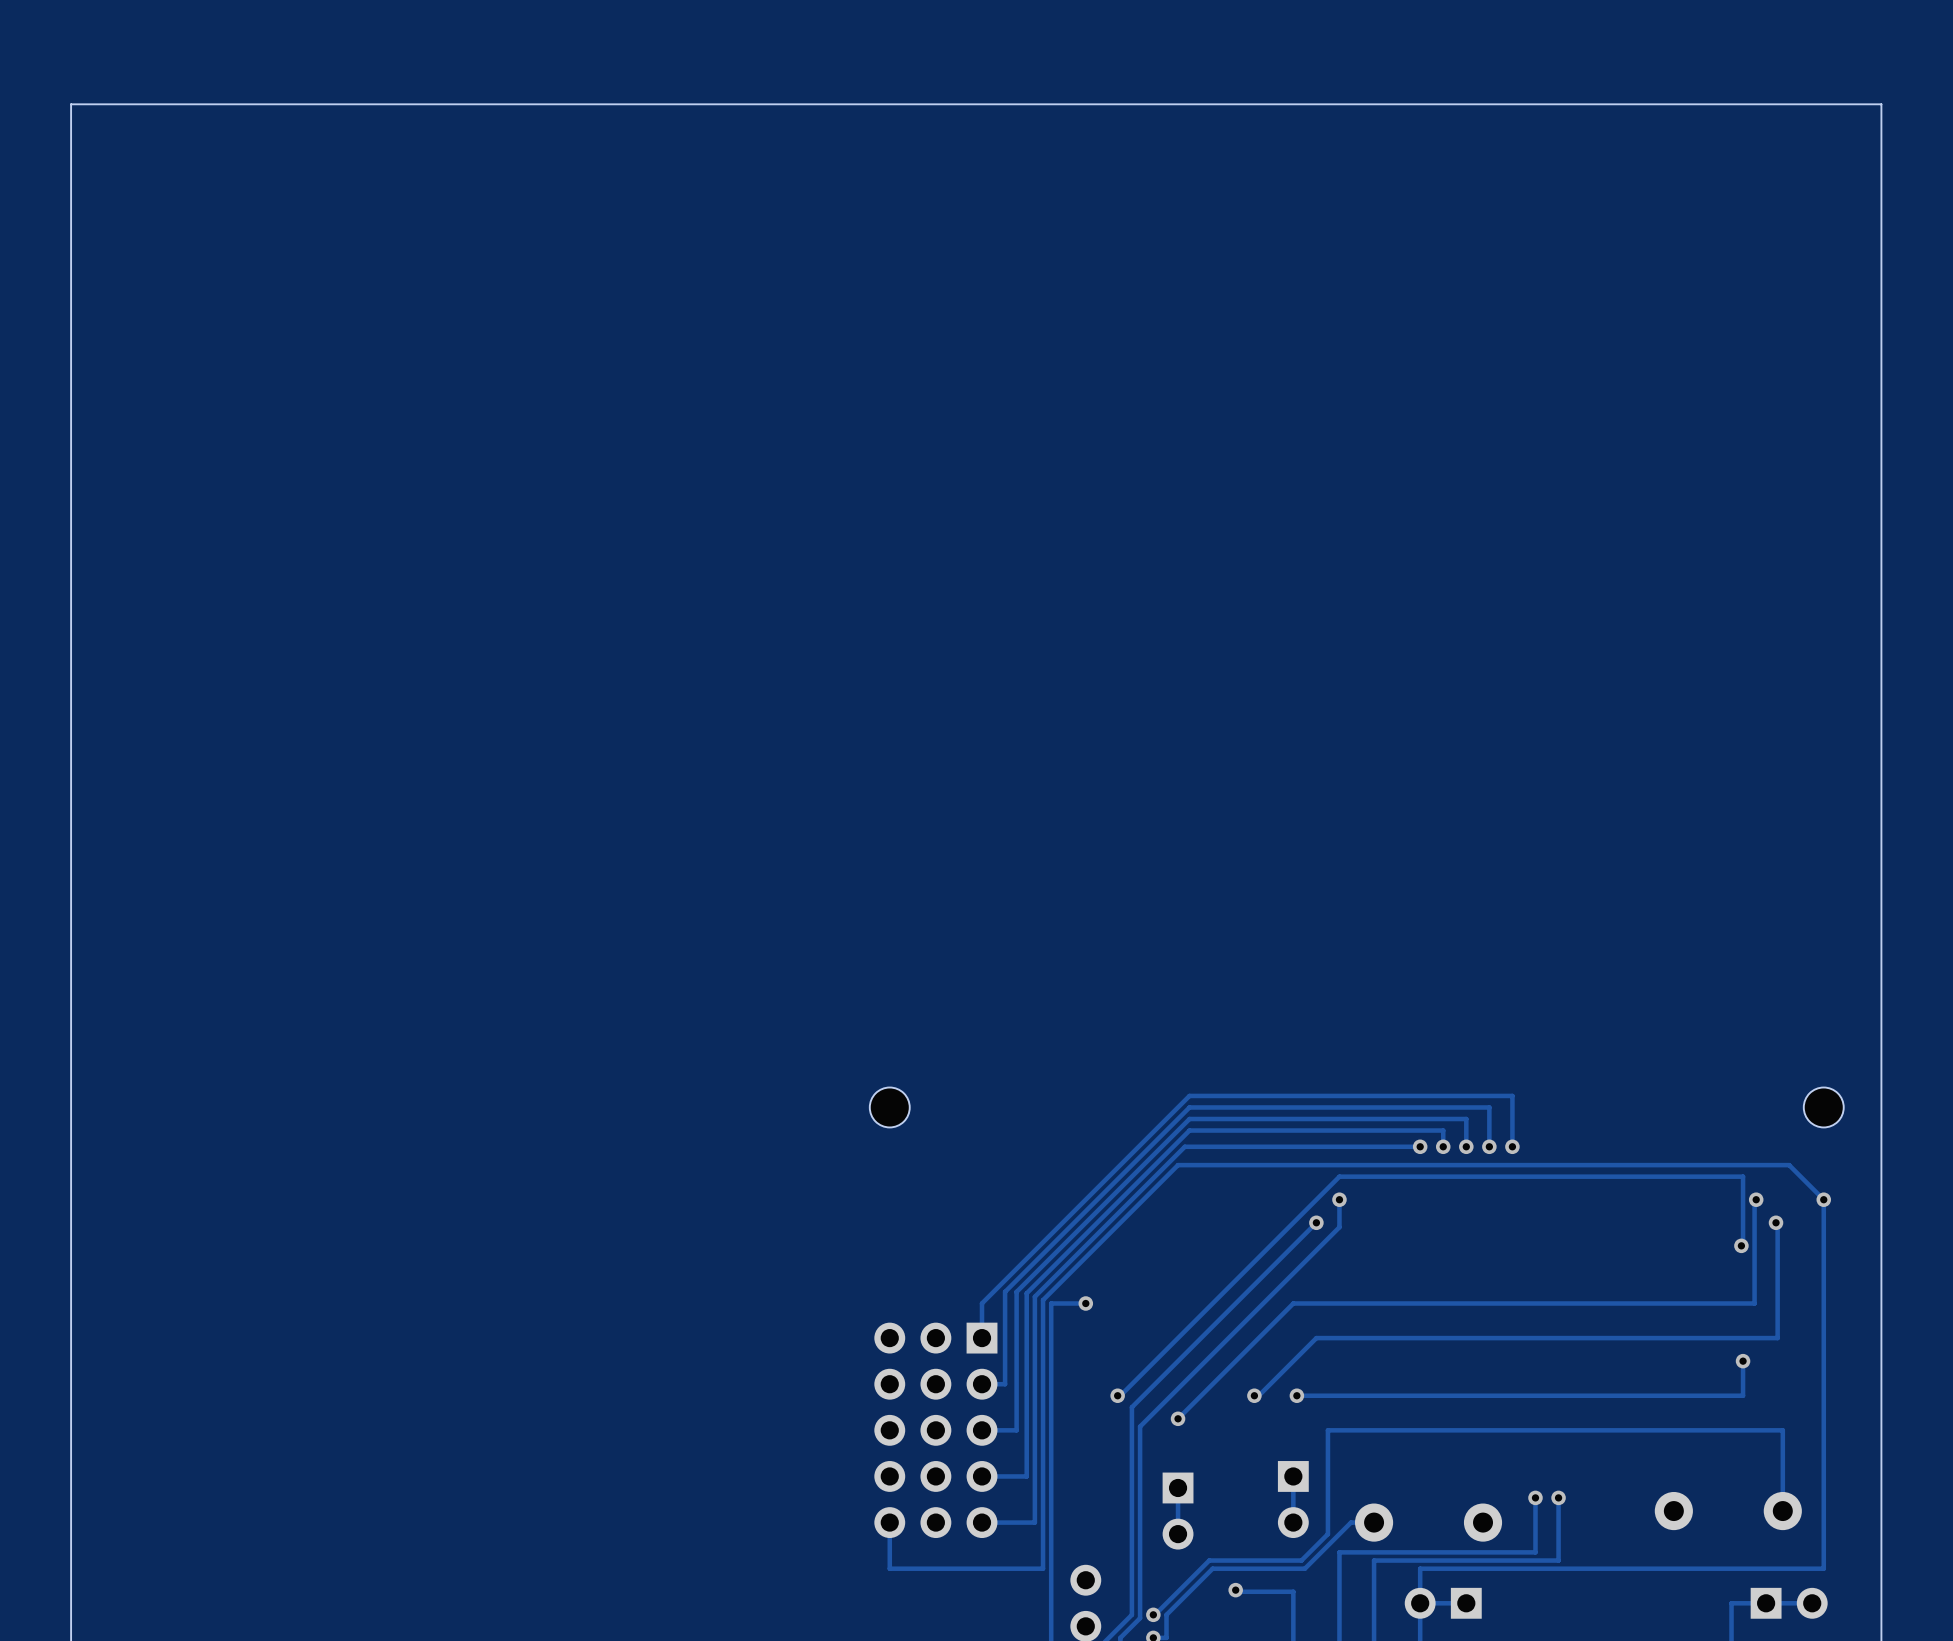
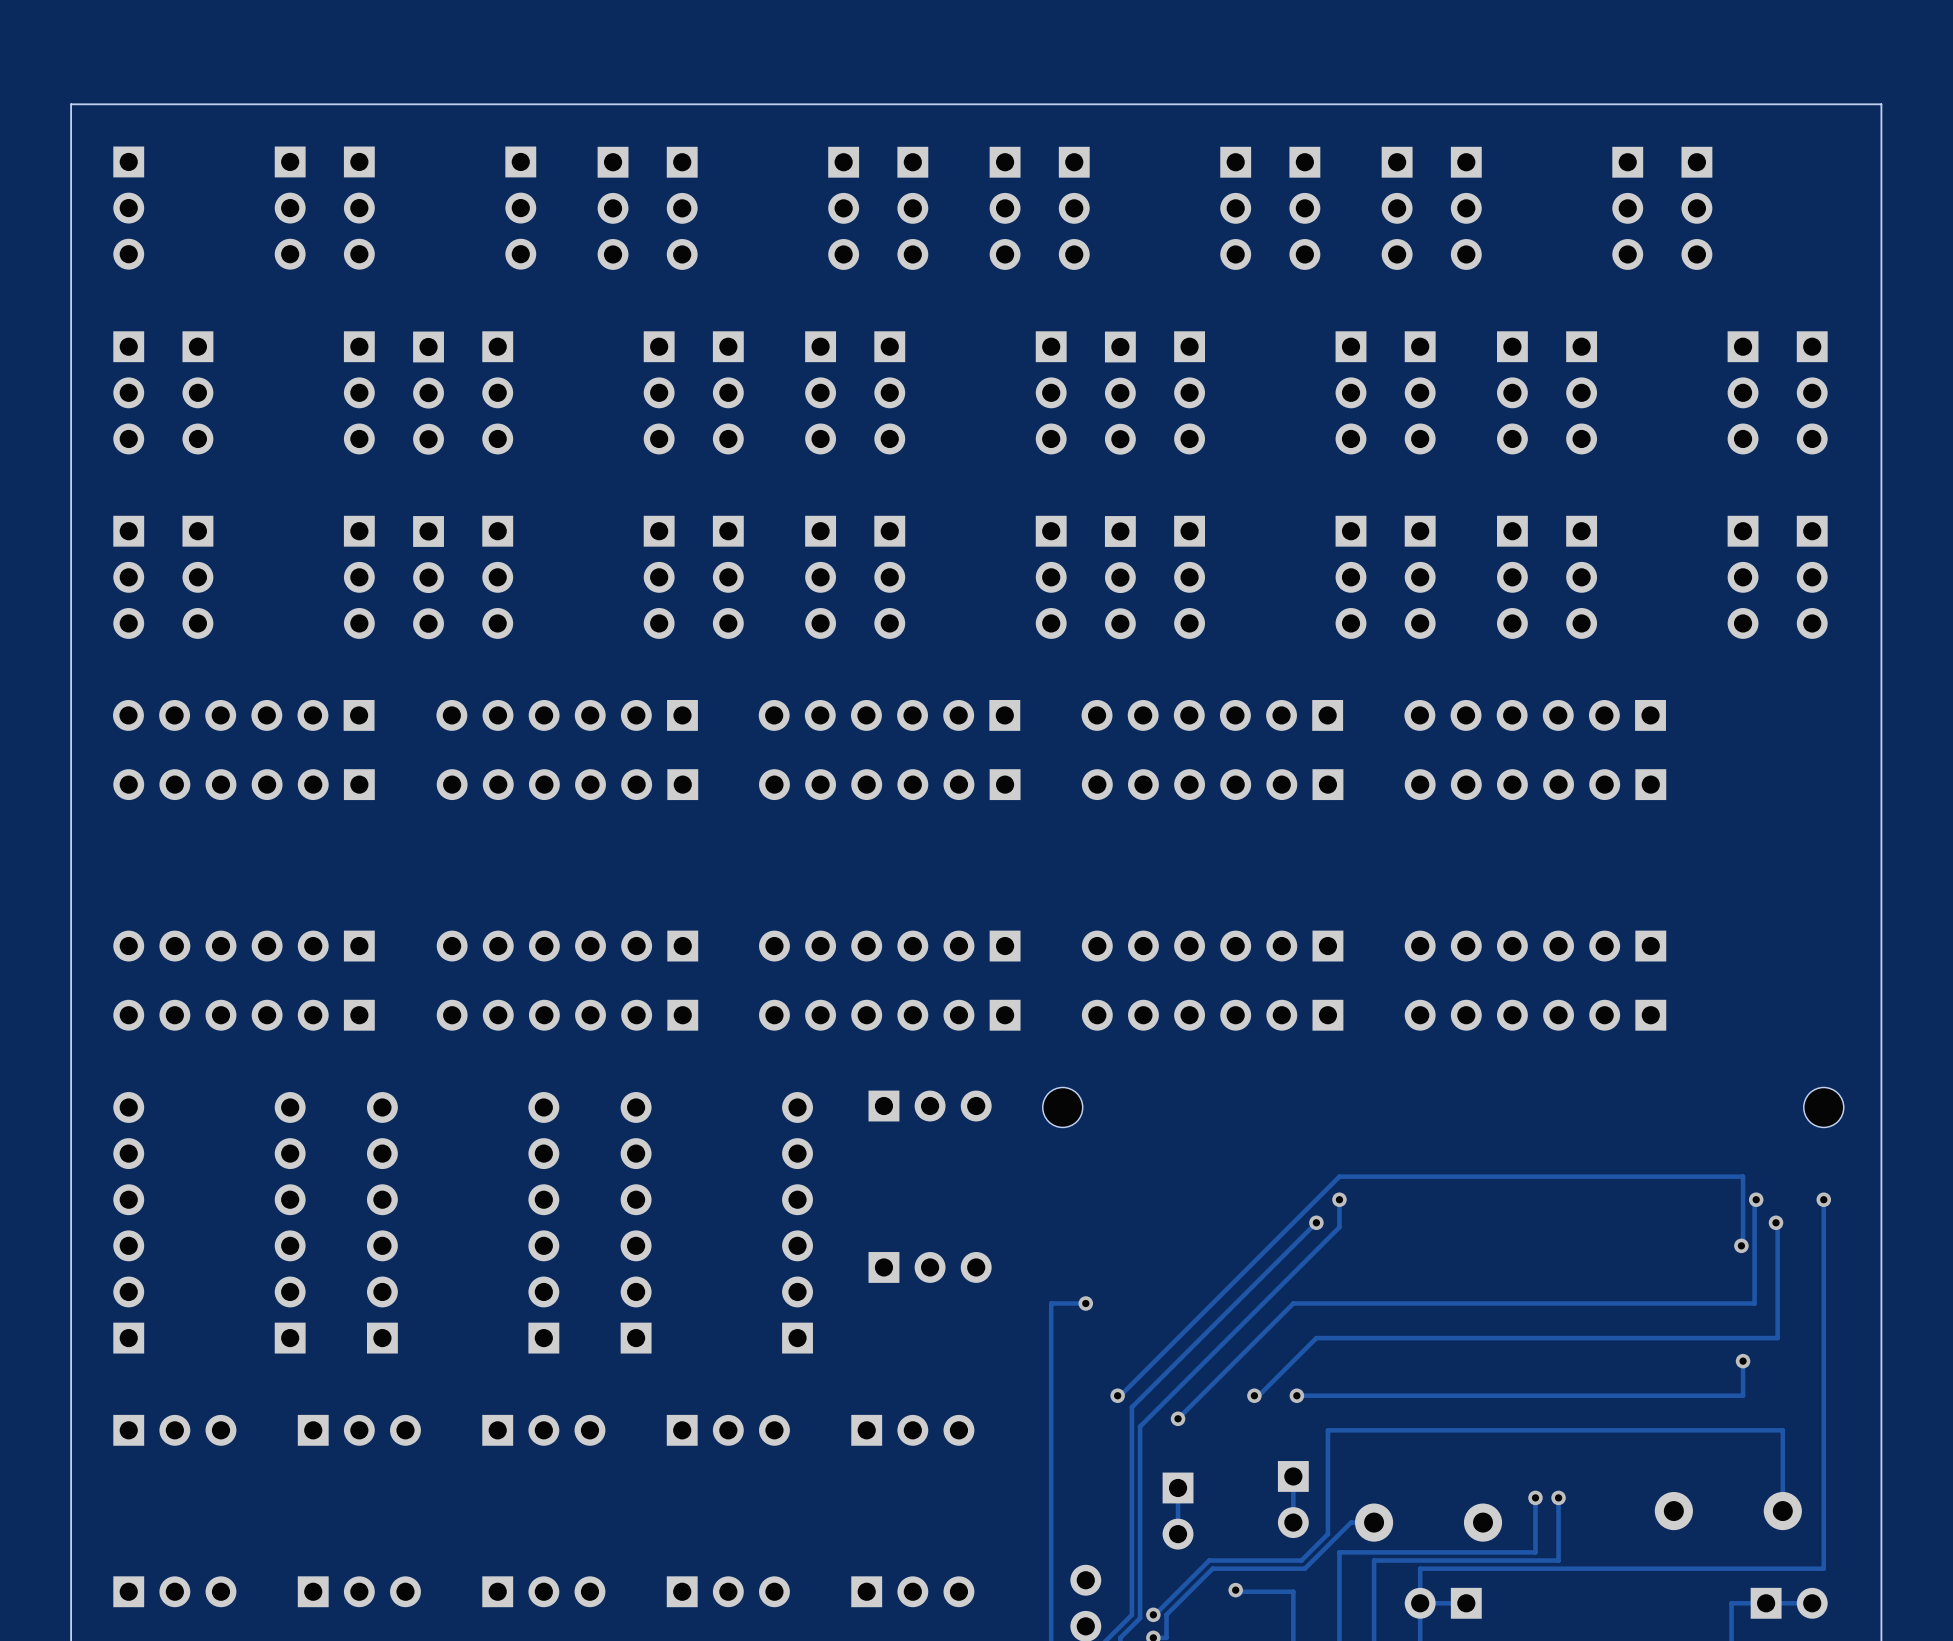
part: none -> (128, 208)
part: none -> (290, 208)
part: none -> (359, 208)
part: none -> (520, 208)
part: none -> (613, 208)
part: none -> (682, 208)
part: none -> (843, 208)
part: none -> (912, 208)
part: none -> (1005, 208)
part: none -> (1074, 208)
part: none -> (1235, 208)
part: none -> (1304, 208)
part: none -> (1397, 208)
part: none -> (1466, 208)
part: none -> (1627, 208)
part: none -> (1696, 208)
part: none -> (128, 392)
part: none -> (197, 392)
part: none -> (359, 392)
part: none -> (497, 392)
part: none -> (659, 392)
part: none -> (728, 392)
part: none -> (820, 392)
part: none -> (889, 392)
part: none -> (1051, 392)
part: none -> (1189, 392)
part: none -> (1351, 392)
part: none -> (1420, 392)
part: none -> (1512, 392)
part: none -> (1581, 392)
part: none -> (1743, 392)
part: none -> (1812, 392)
part: none -> (428, 393)
part: none -> (1120, 393)
part: none -> (128, 577)
part: none -> (197, 577)
part: none -> (359, 577)
part: none -> (428, 577)
part: none -> (497, 577)
part: none -> (659, 577)
part: none -> (728, 577)
part: none -> (820, 577)
part: none -> (889, 577)
part: none -> (1051, 577)
part: none -> (1120, 577)
part: none -> (1189, 577)
part: none -> (1351, 577)
part: none -> (1420, 577)
part: none -> (1512, 577)
part: none -> (1581, 577)
part: none -> (1743, 577)
part: none -> (1812, 577)
part: none -> (243, 715)
part: none -> (567, 715)
part: none -> (889, 715)
part: none -> (1212, 715)
part: none -> (1535, 715)
part: none -> (244, 784)
part: none -> (567, 784)
part: none -> (889, 784)
part: none -> (1212, 784)
part: none -> (1535, 784)
part: none -> (244, 946)
part: none -> (567, 946)
part: none -> (889, 946)
part: none -> (1212, 946)
part: none -> (1535, 946)
part: none -> (244, 1015)
part: none -> (567, 1015)
part: none -> (889, 1015)
part: none -> (1212, 1015)
part: none -> (1535, 1015)
part: none -> (930, 1106)
part position: (889, 1107) -> (1062, 1107)
track: (1420, 1146) (1184, 1146) (1034, 1296) (1034, 1522) (982, 1522) -> none
via: (1420, 1146) -> none
track: (1443, 1146) (1443, 1130) (1189, 1130) (1026, 1293) (1026, 1476) (982, 1476) -> none
via: (1443, 1146) -> none
track: (1466, 1146) (1466, 1119) (1189, 1119) (1016, 1291) (1016, 1430) (982, 1430) -> none
via: (1466, 1146) -> none
track: (1489, 1146) (1489, 1107) (1189, 1107) (1005, 1291) (1005, 1384) (982, 1384) -> none
via: (1489, 1146) -> none
track: (1512, 1146) (1512, 1095) (1189, 1095) (982, 1303) (982, 1337) -> none
via: (1512, 1146) -> none
track: (1823, 1199) (1789, 1165) (1178, 1165) (1043, 1300) (1043, 1568) (889, 1568) (889, 1522) -> none
part: none -> (128, 1222)
part: none -> (290, 1222)
part: none -> (382, 1222)
part: none -> (543, 1222)
part: none -> (636, 1222)
part: none -> (797, 1222)
part: none -> (930, 1267)
part: none -> (174, 1430)
part: none -> (359, 1430)
part: none -> (543, 1430)
part: none -> (728, 1430)
part: none -> (912, 1430)
part: (935, 1430) -> none
part: none -> (174, 1591)
part: none -> (359, 1591)
part: none -> (543, 1591)
part: none -> (728, 1591)
part: none -> (912, 1591)

